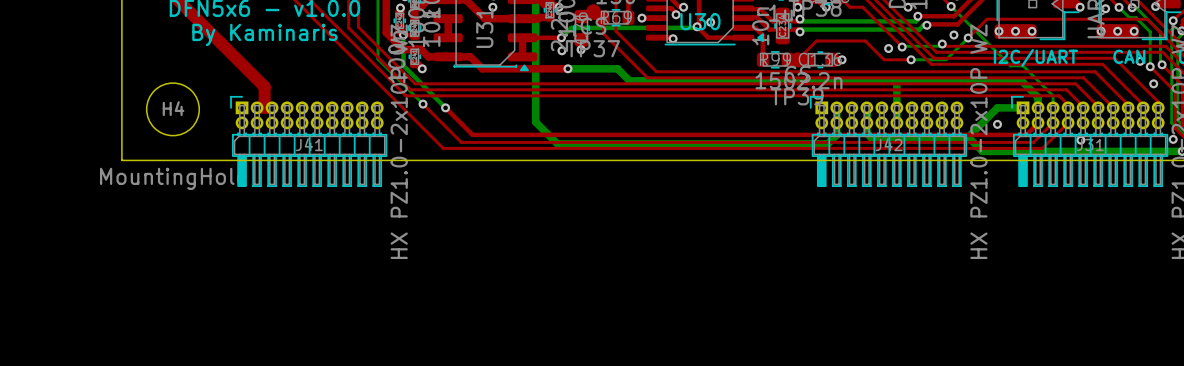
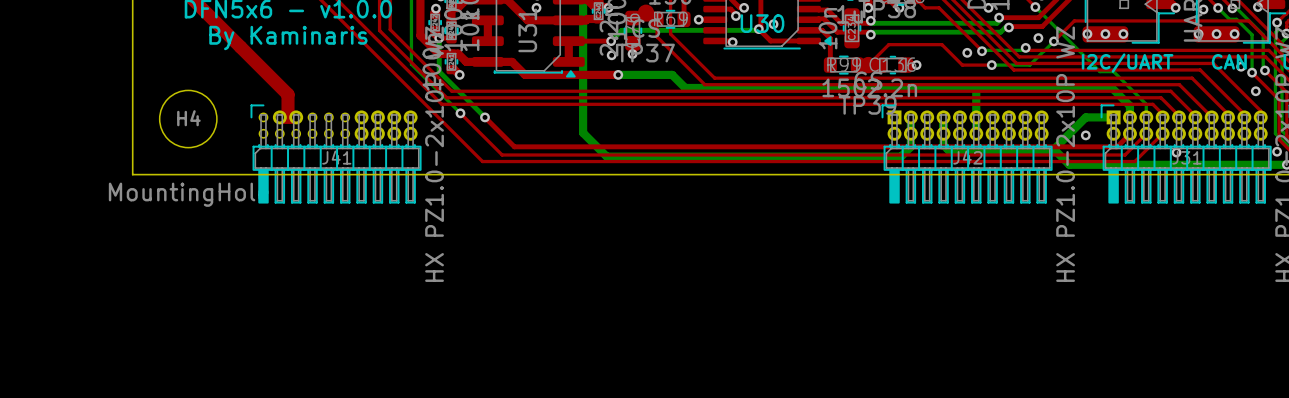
J41 footprint: [230, 95, 388, 188] -> [250, 104, 422, 204]

